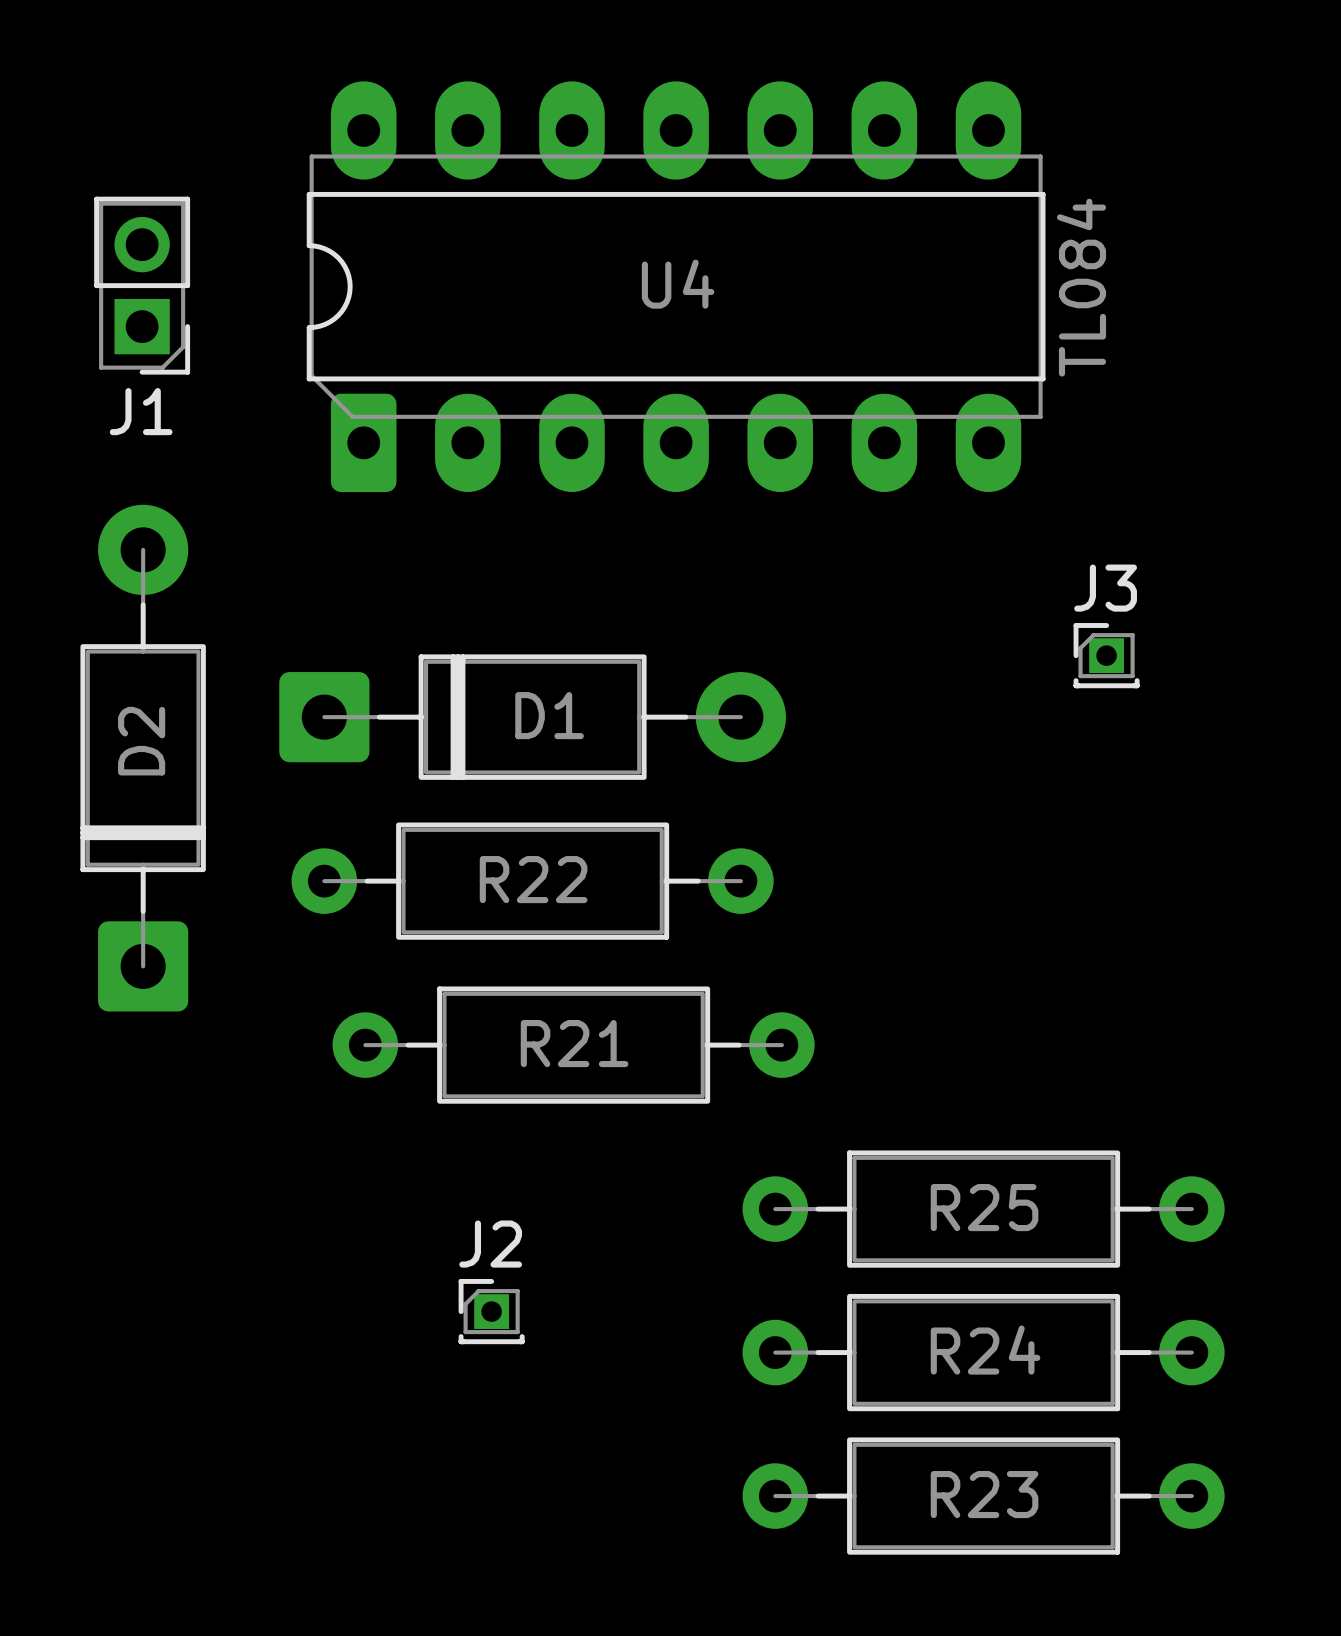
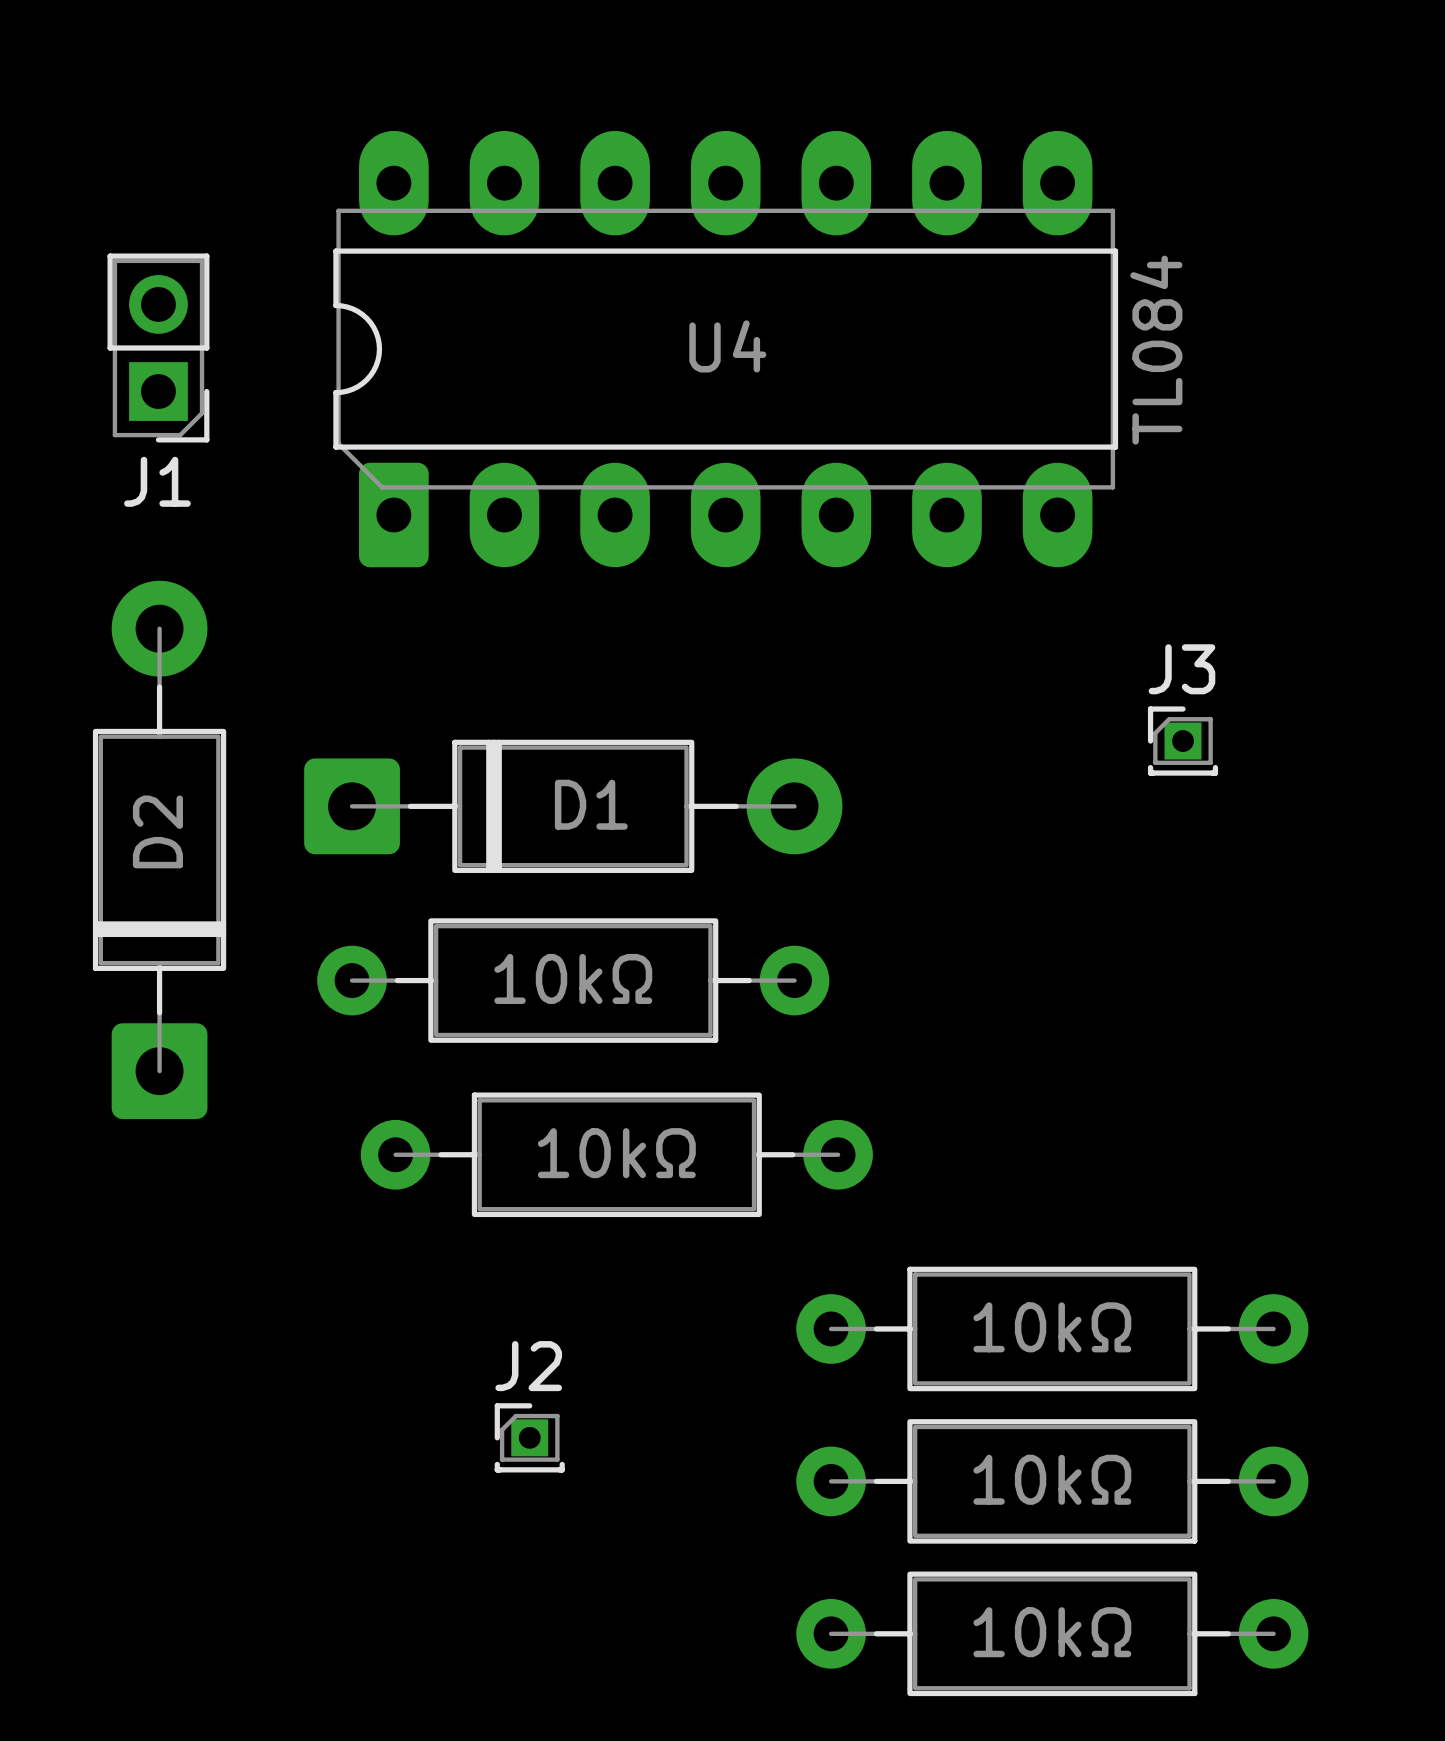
R22 name: R22 (533, 879) -> 10kΩ (573, 978)
R21 name: R21 (574, 1043) -> 10kΩ (616, 1153)
R25 name: R25 (984, 1207) -> 10kΩ (1052, 1327)
R24 name: R24 (985, 1350) -> 10kΩ (1052, 1479)
R23 name: R23 (984, 1494) -> 10kΩ (1052, 1632)

